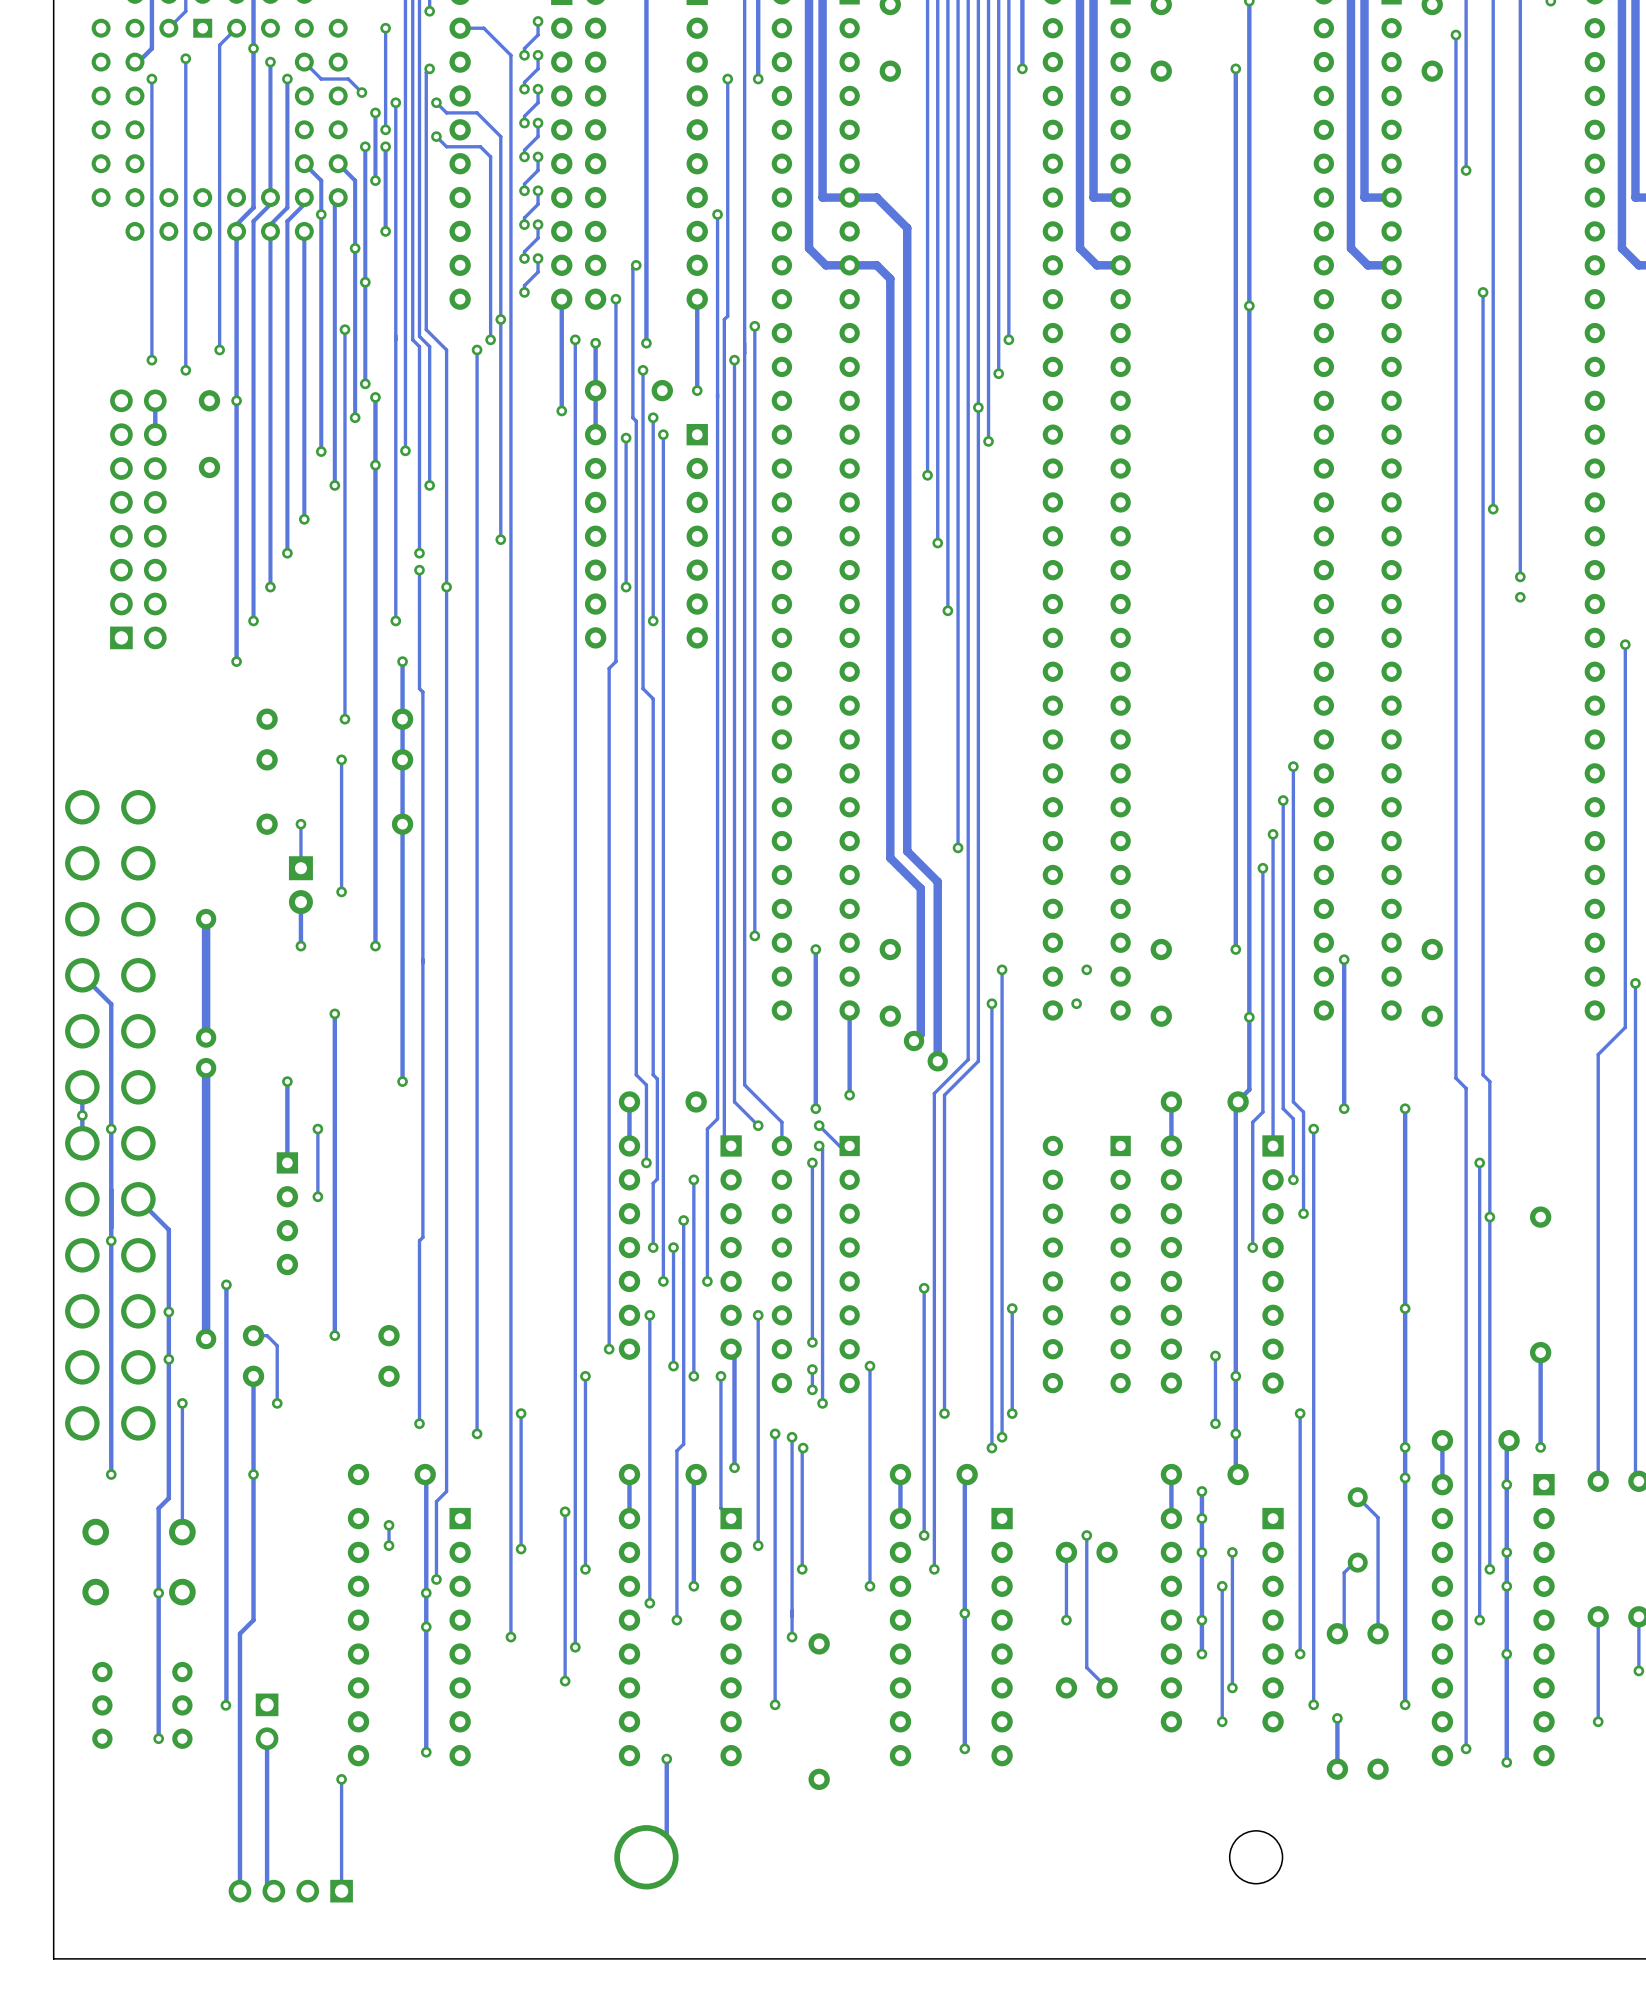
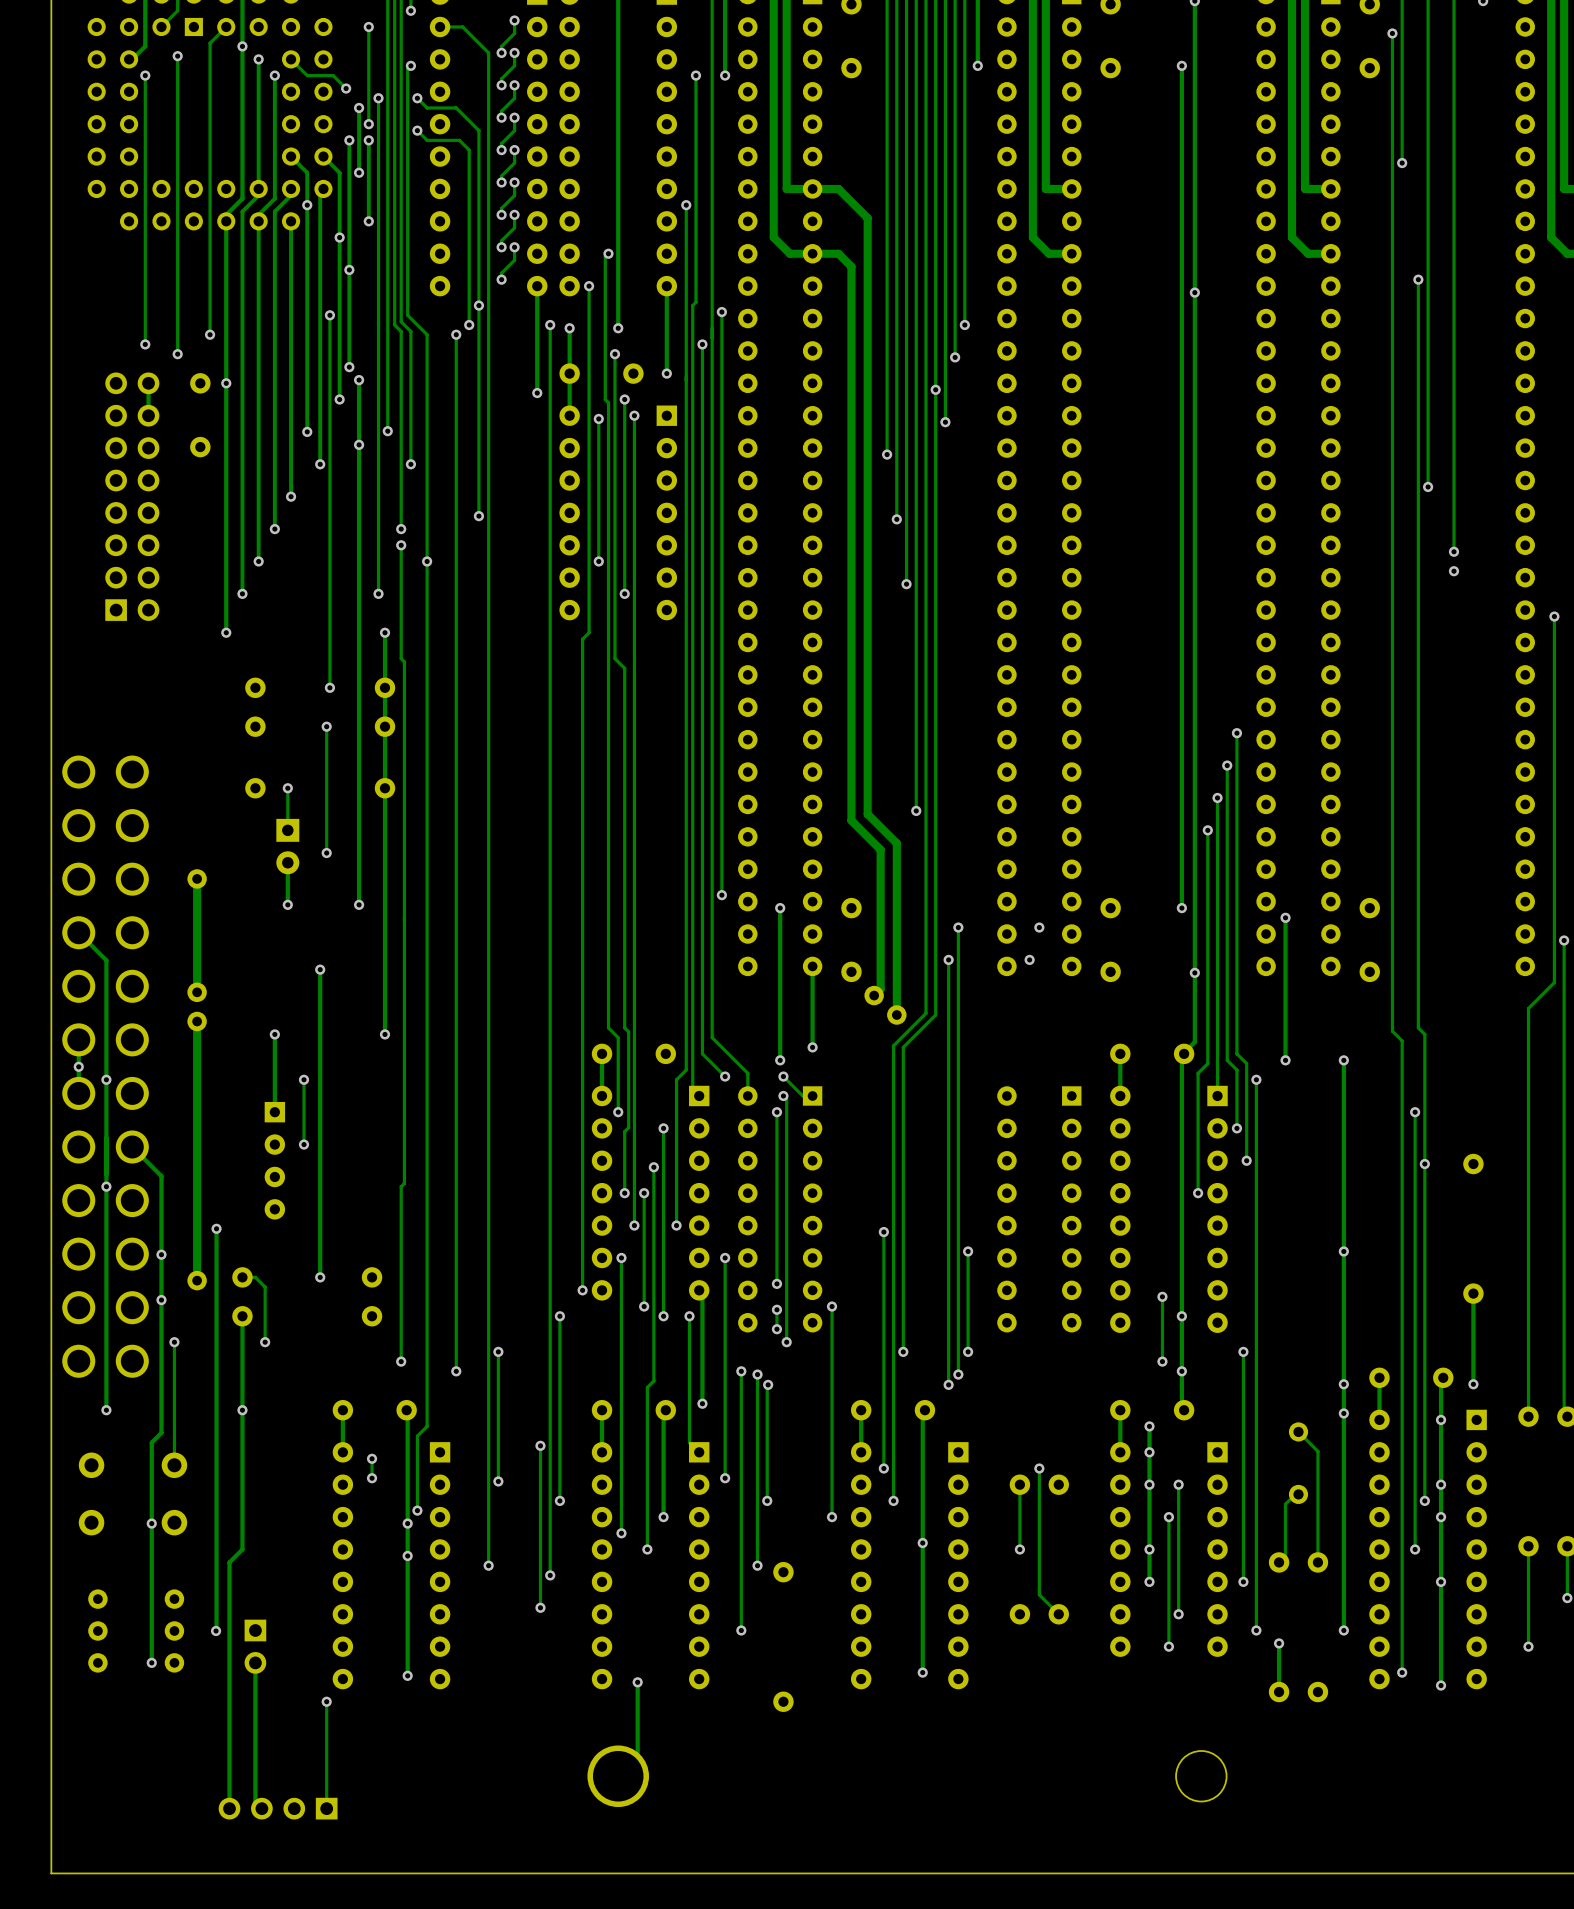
track: none -> (342, 1410) (342, 1452)

